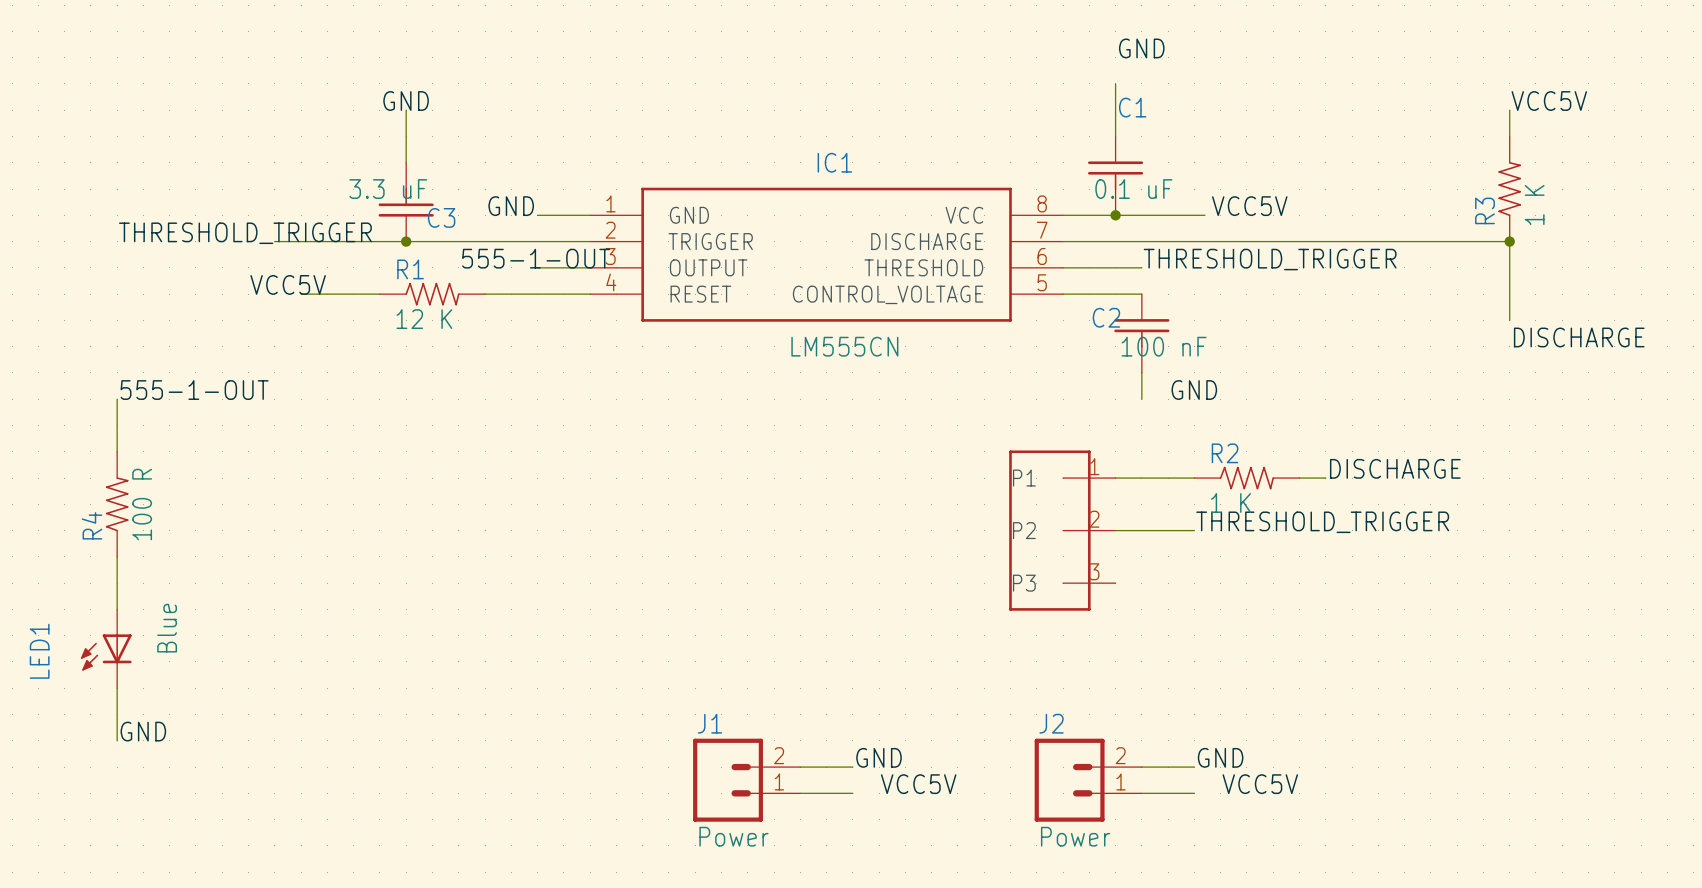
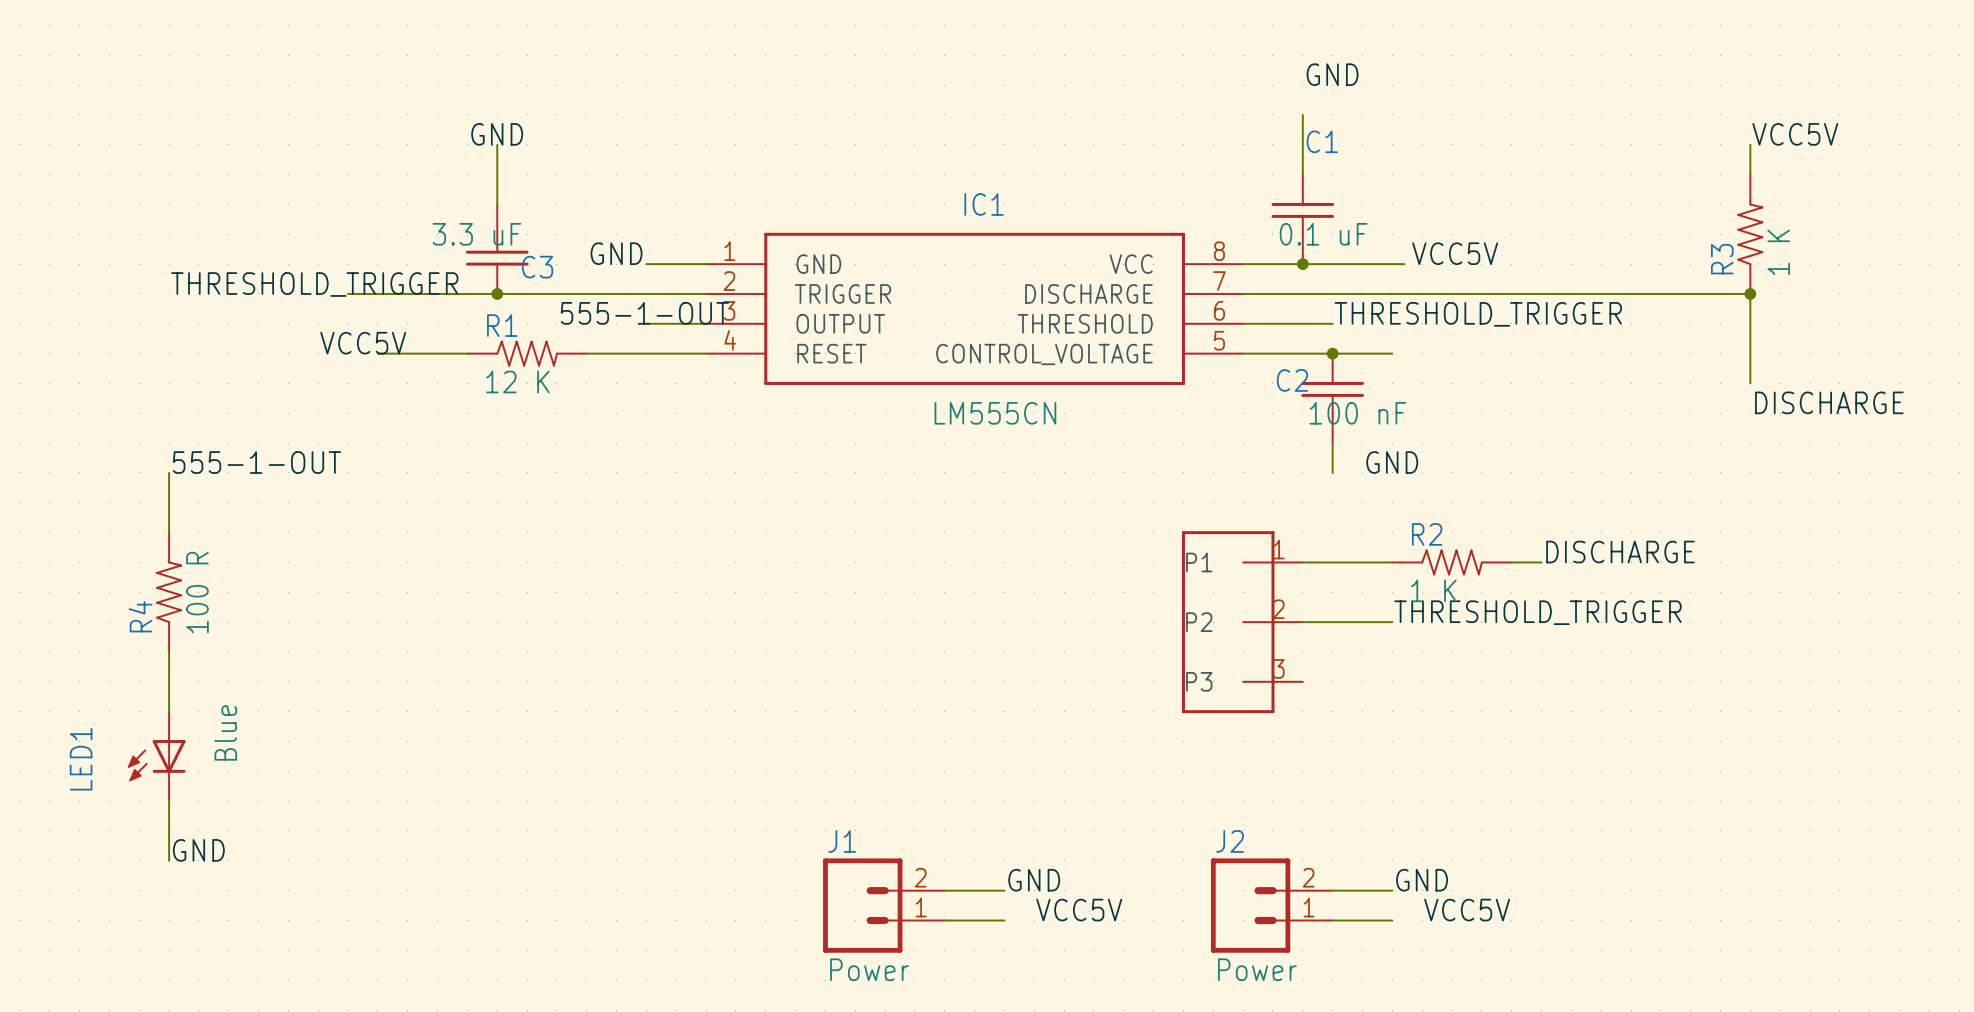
wire: none -> (1332, 353) (1392, 353)
junction: none -> (1332, 353)

